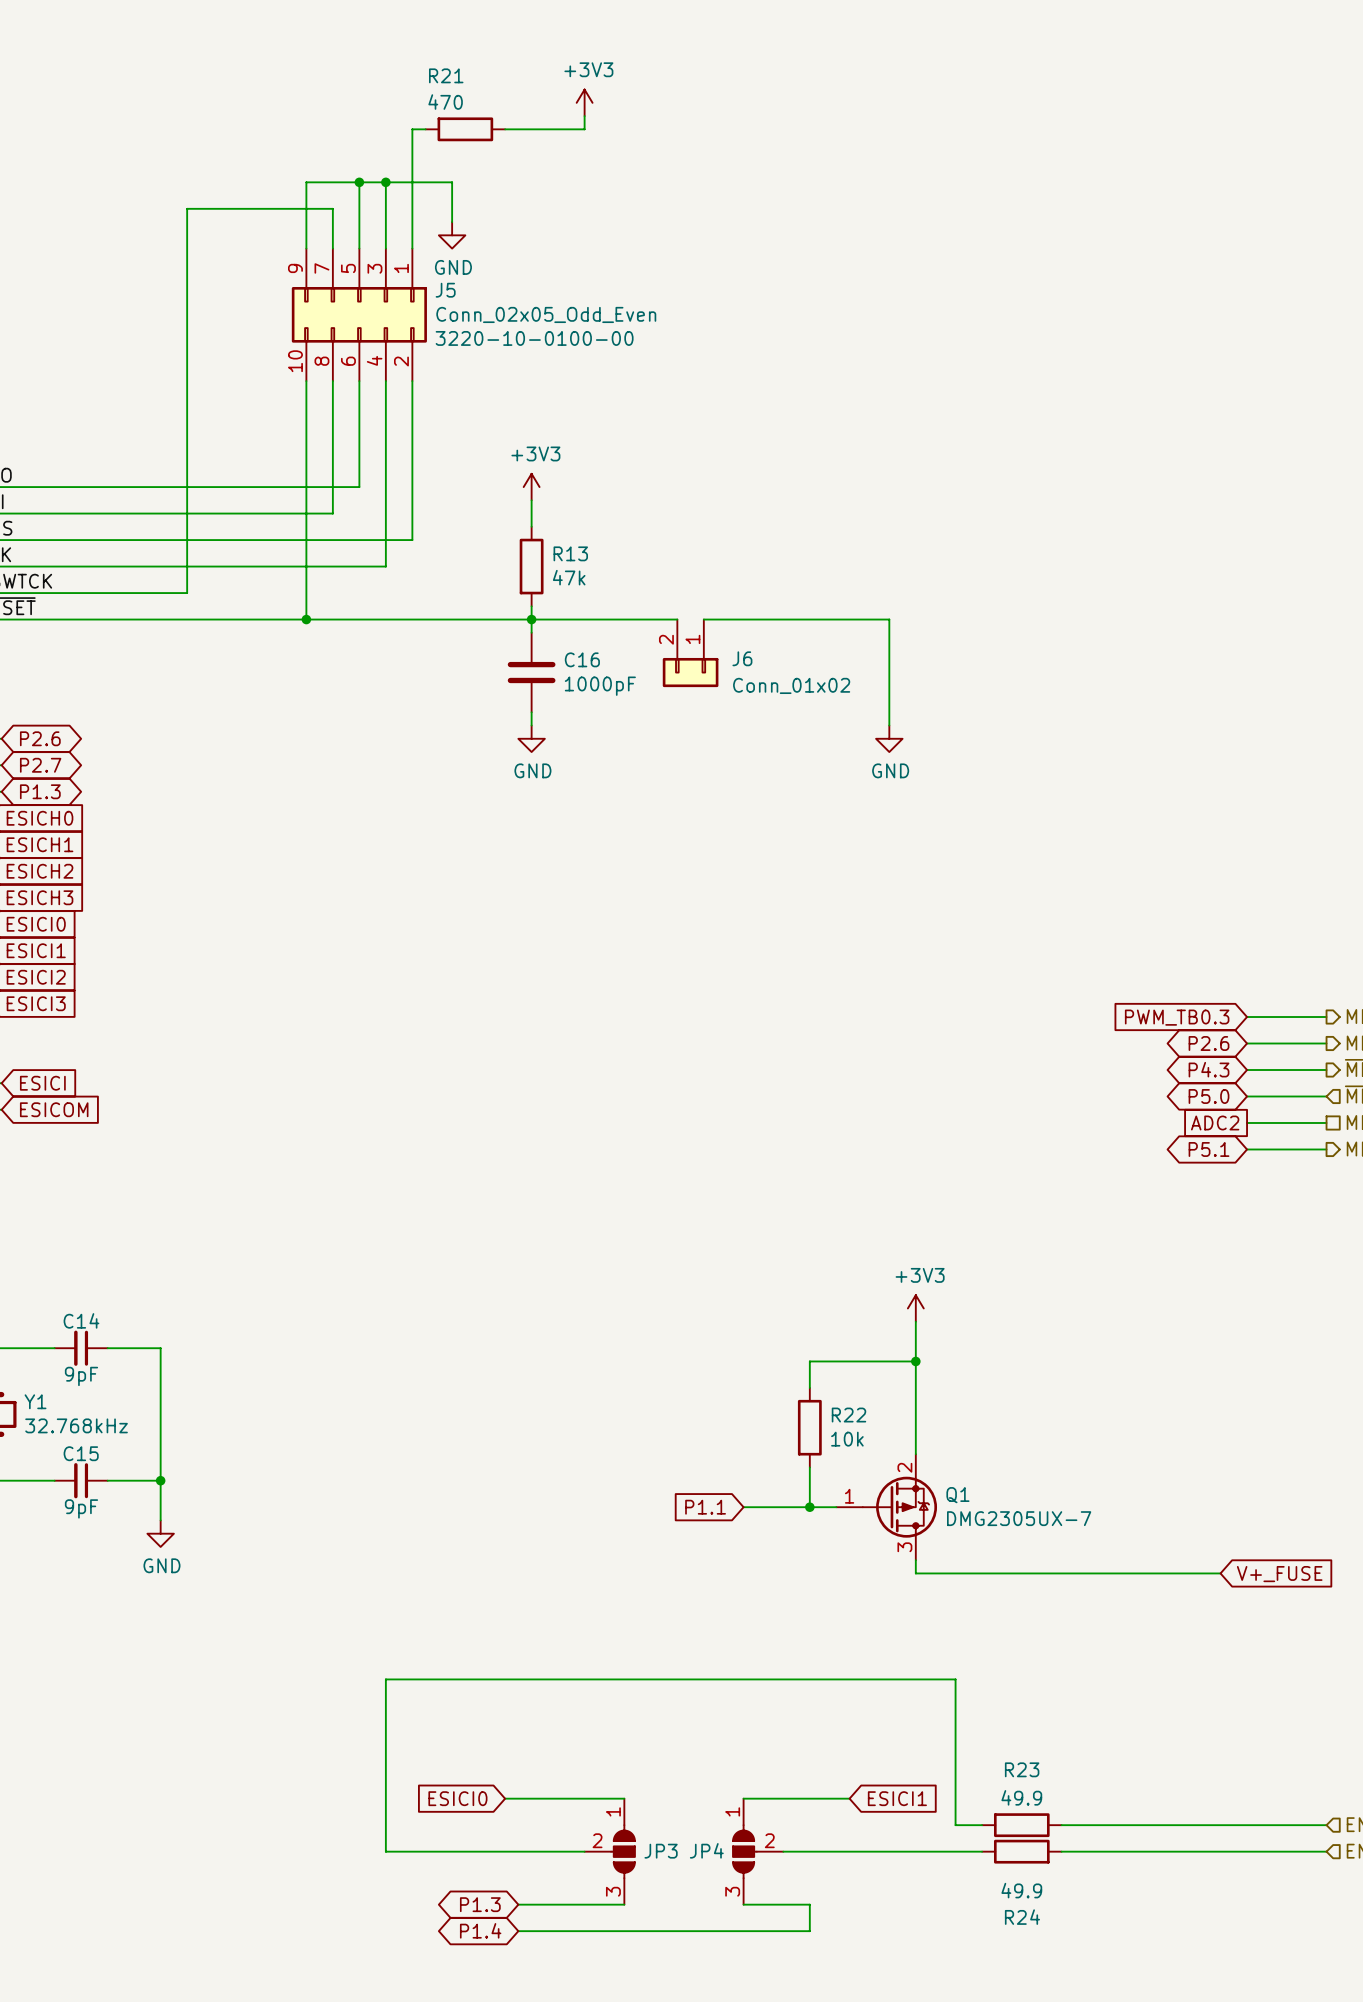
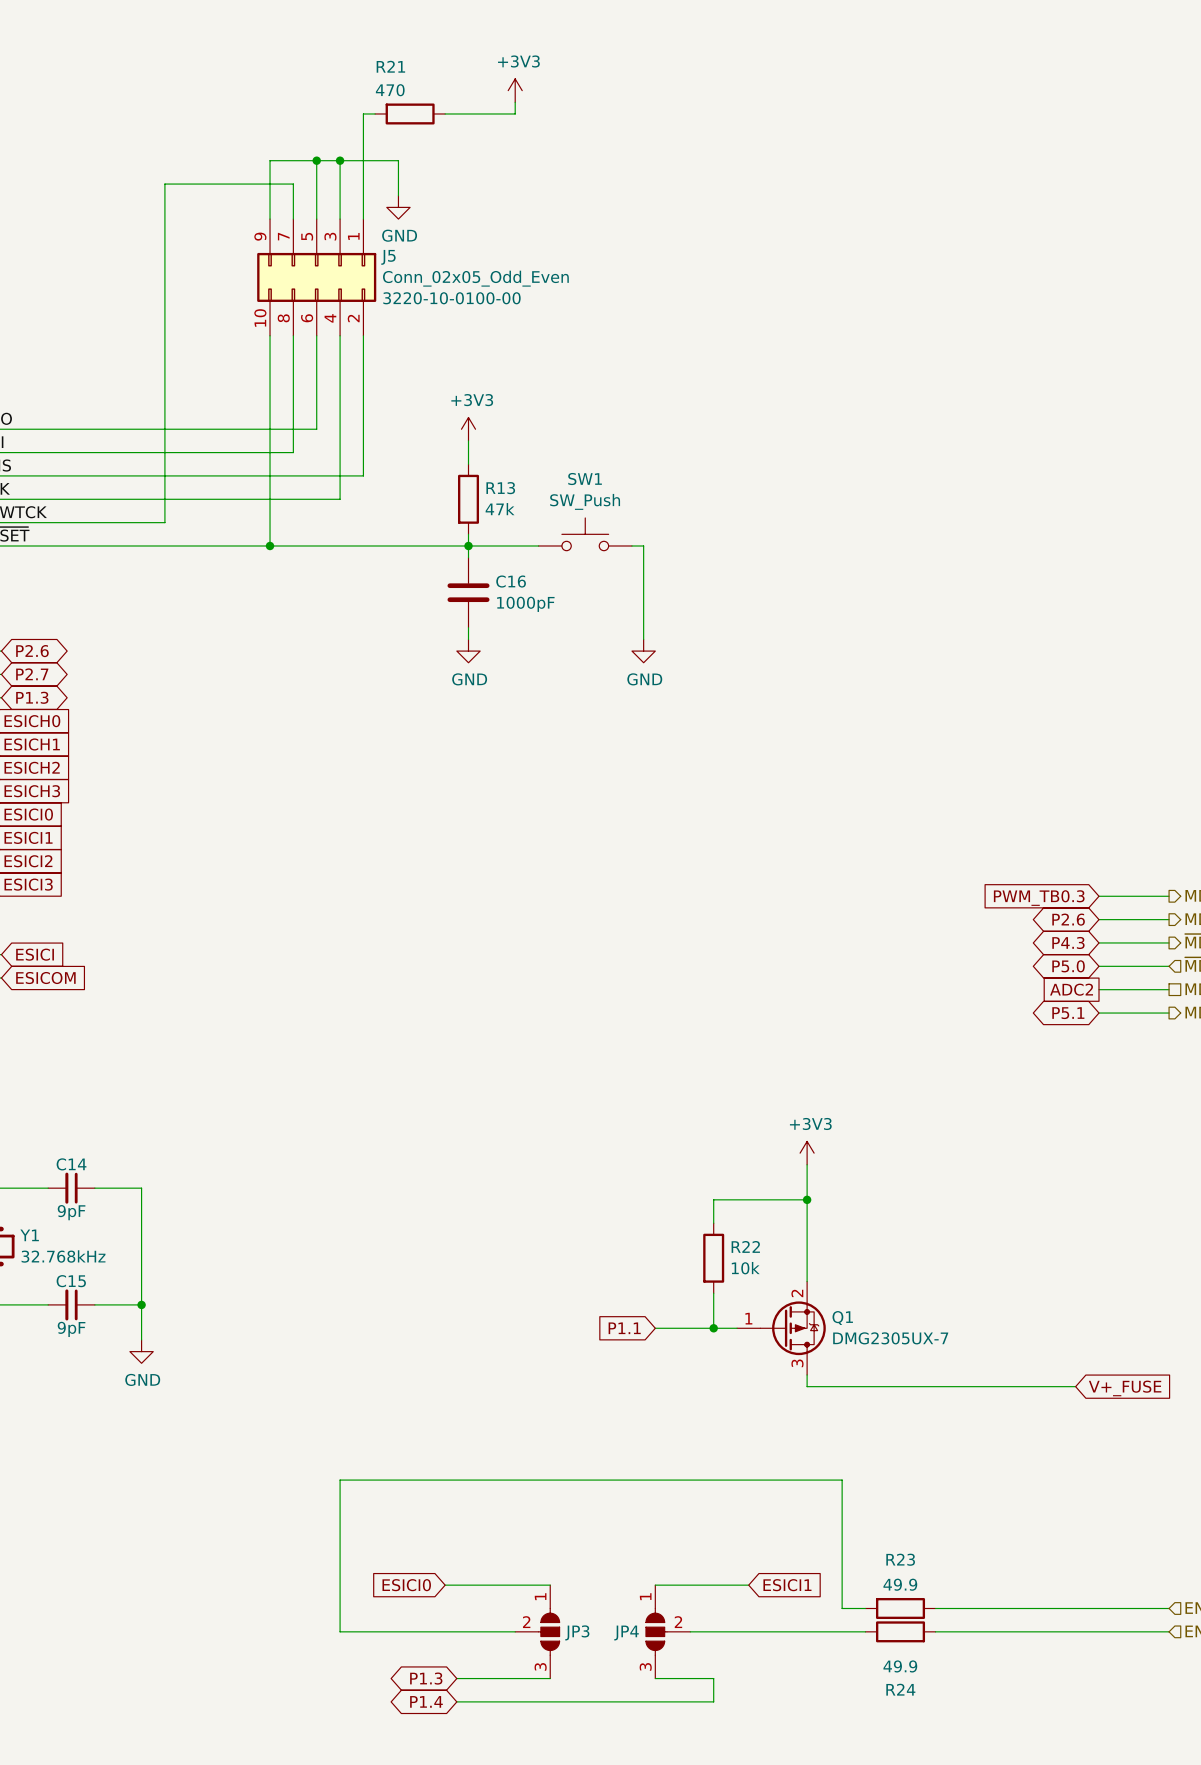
SW1: none -> SW_Push (585, 534)
wire: (611, 619) (677, 619) -> none
wire: (730, 619) (889, 619) (889, 725) -> (643, 545) (643, 639)
J6: Conn_01x02 (690, 653) -> none
power symbol position: GND (889, 738) -> GND (643, 651)

